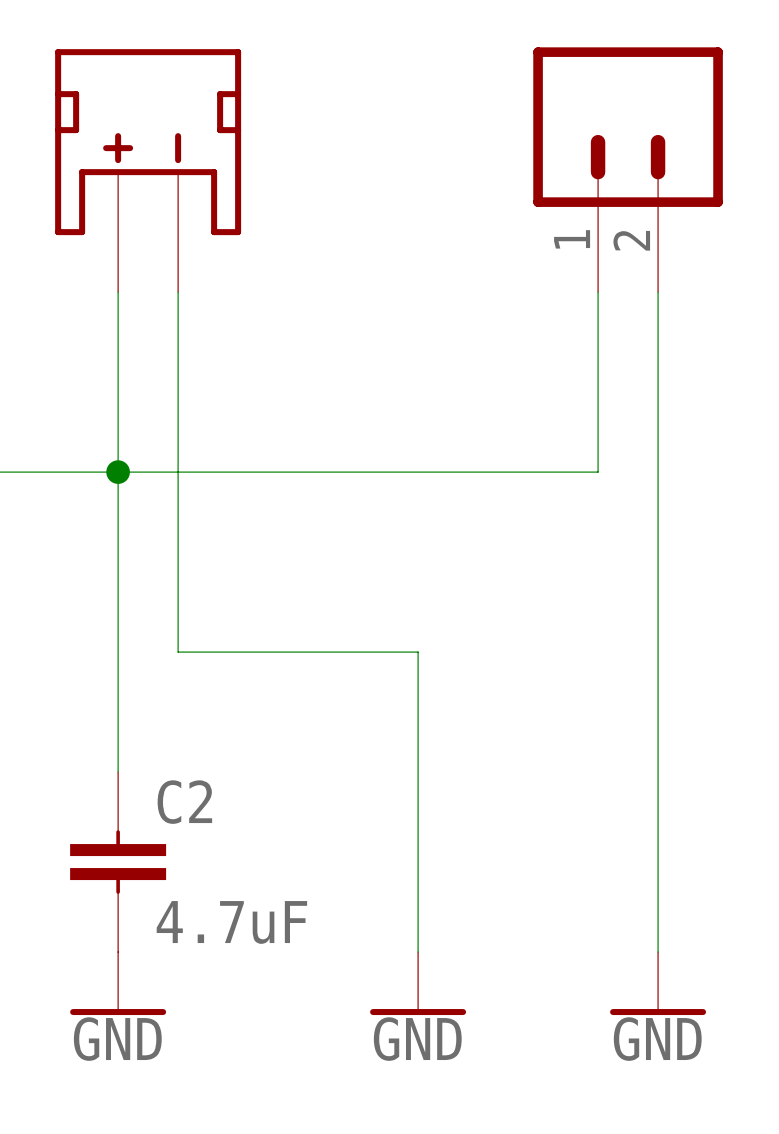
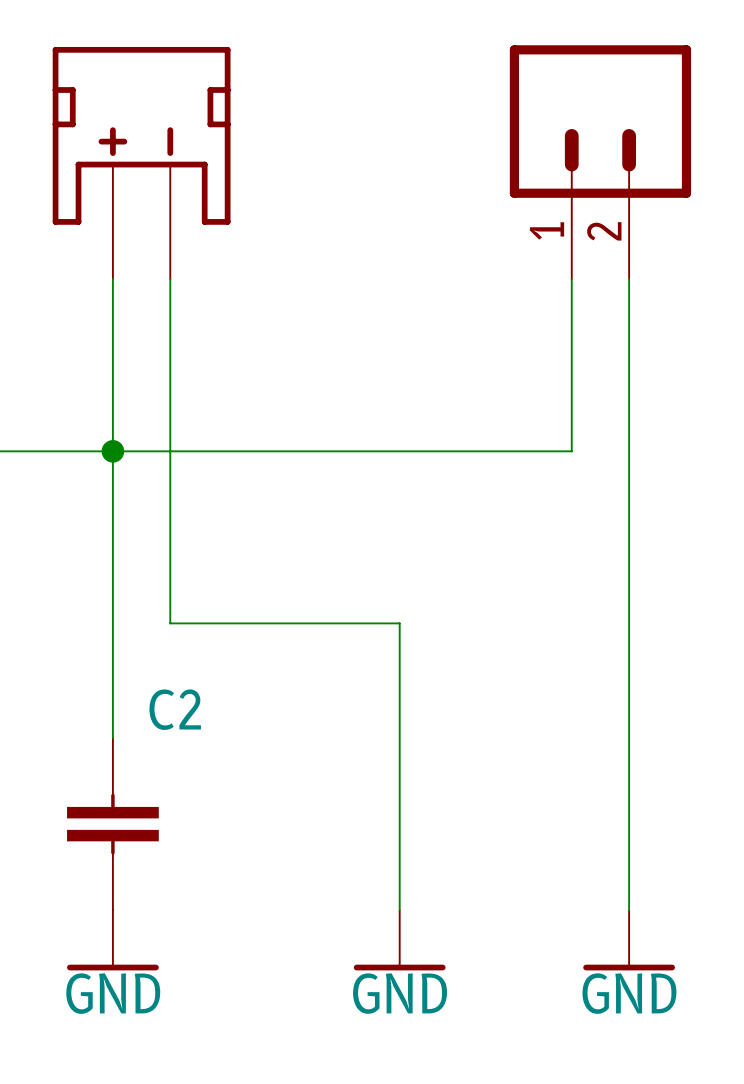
C2 name position: C2 (184, 802) -> C2 (175, 709)
C2 value: 4.7uF (231, 922) -> none

